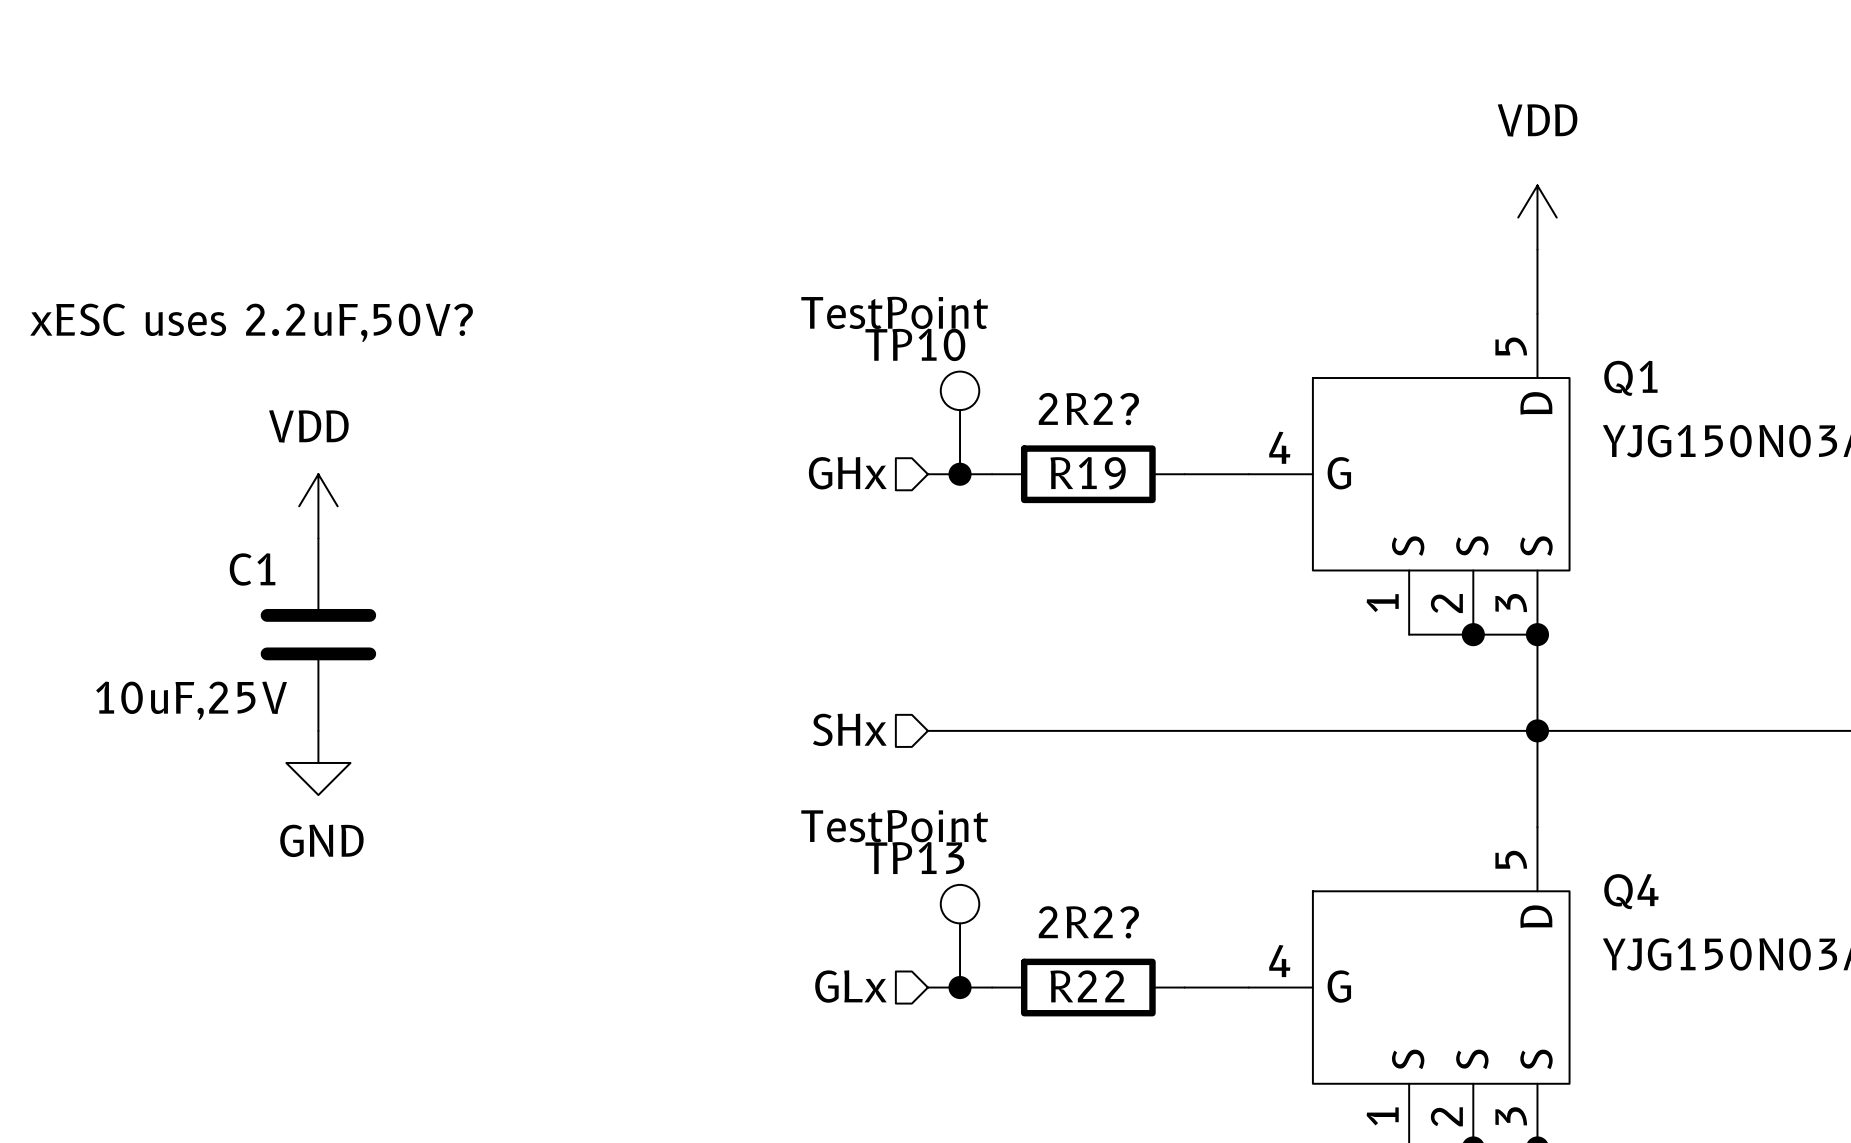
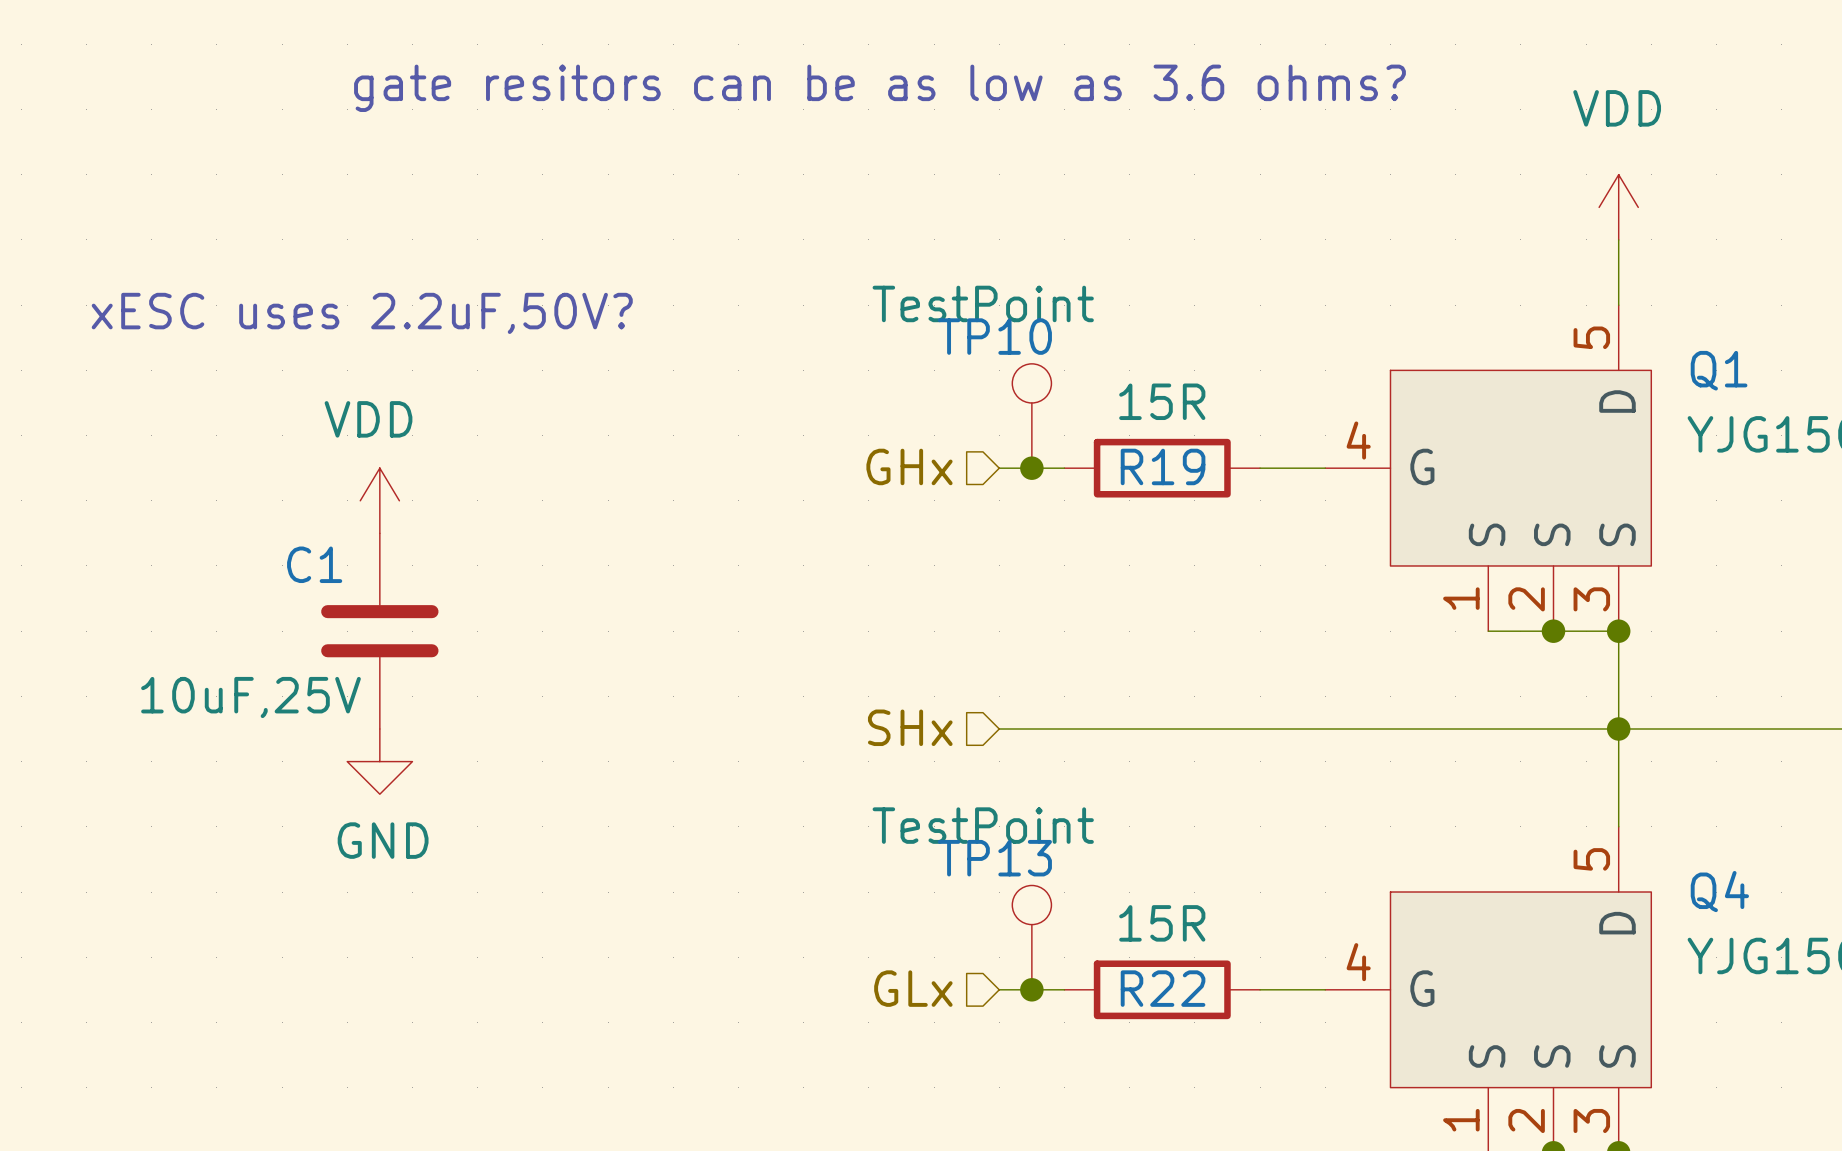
text: none -> gate resitors can be as low as 3.6 ohms? (879, 88)
R19 value: 2R2? (1088, 409) -> 15R (1162, 401)
R22 value: 2R2? (1088, 922) -> 15R (1162, 923)

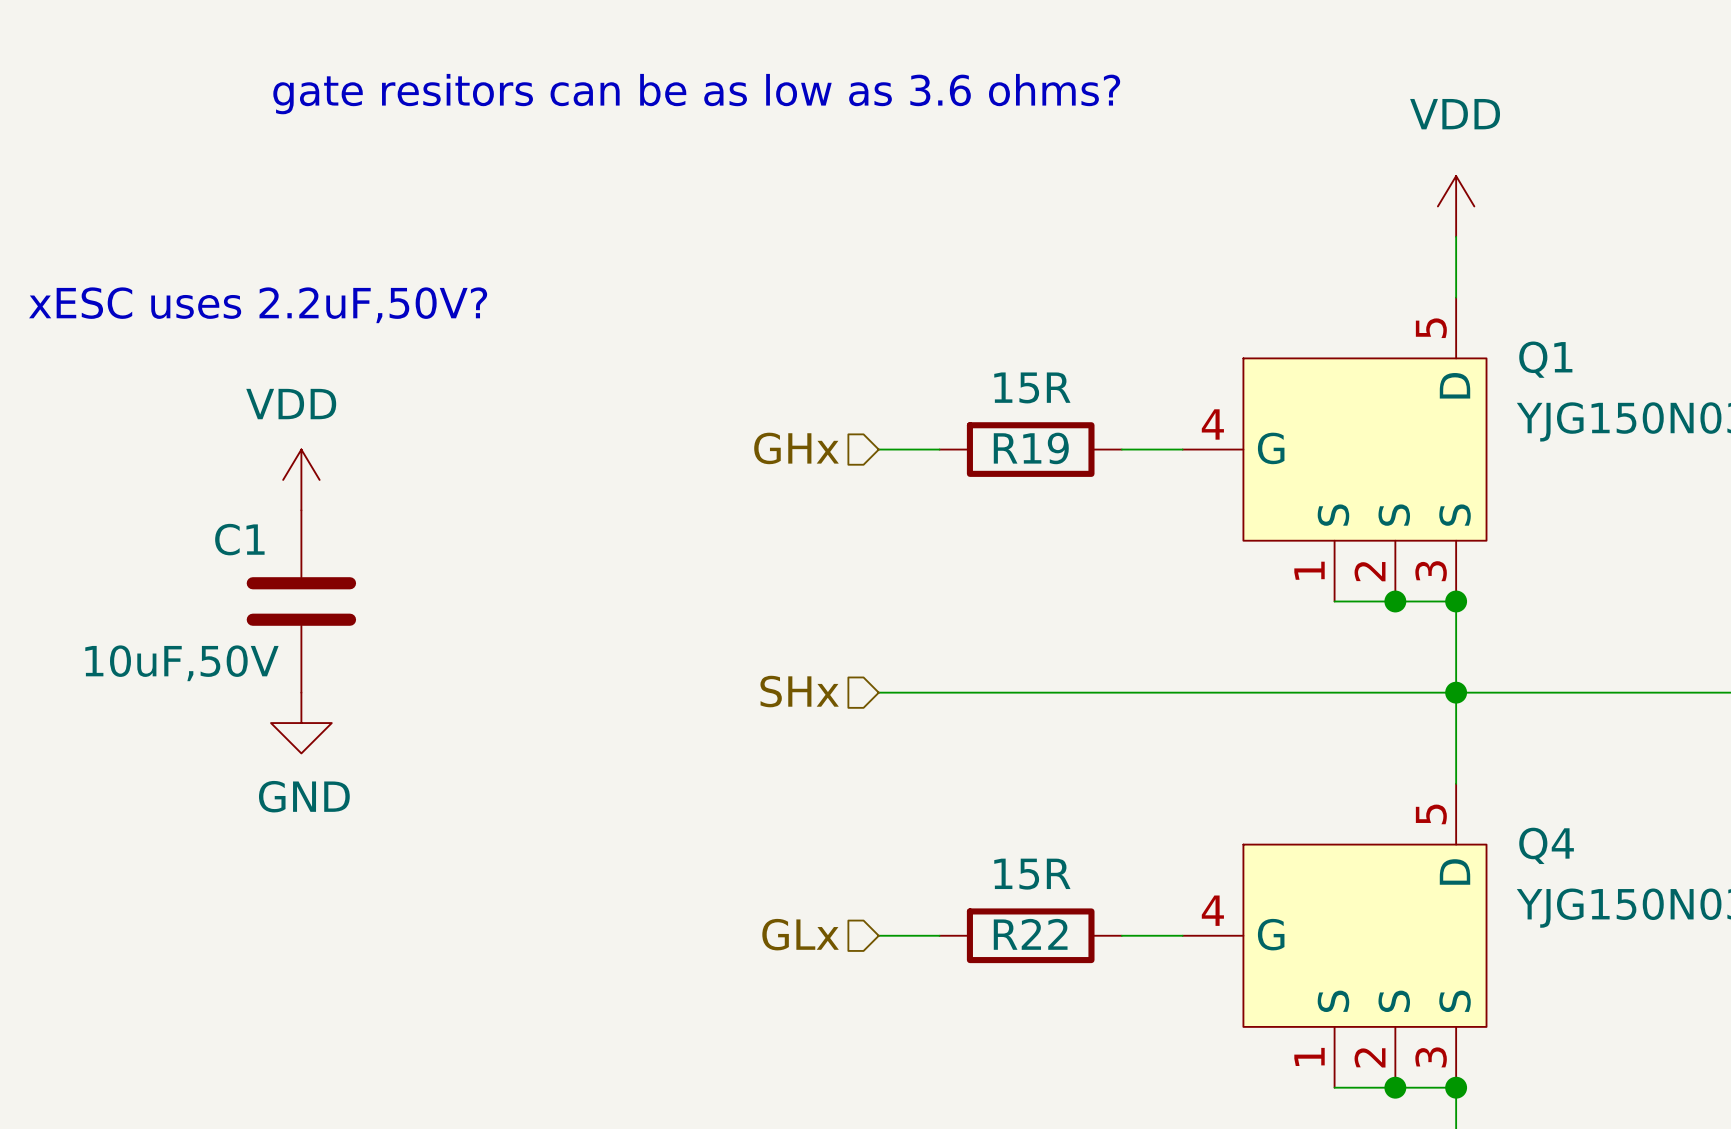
TP10: TestPoint (1031, 416) -> none
junction: (1031, 468) -> none
C1 value: 10uF,25V (250, 697) -> 10uF,50V (181, 663)
TP13: TestPoint (1031, 937) -> none
junction: (1031, 989) -> none

